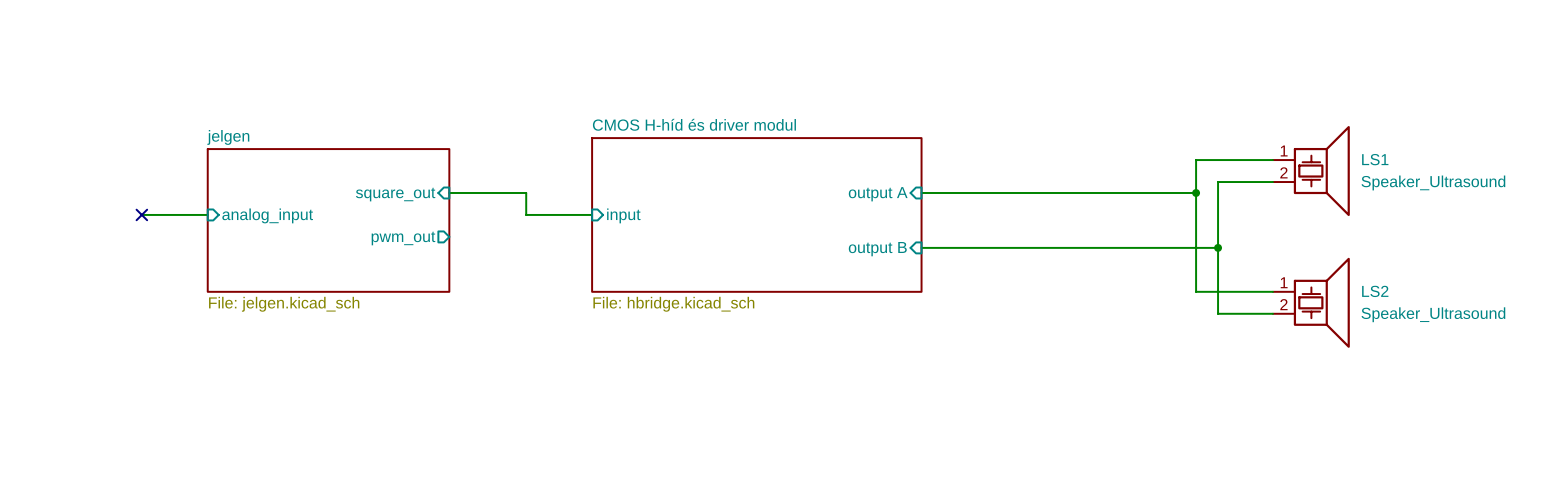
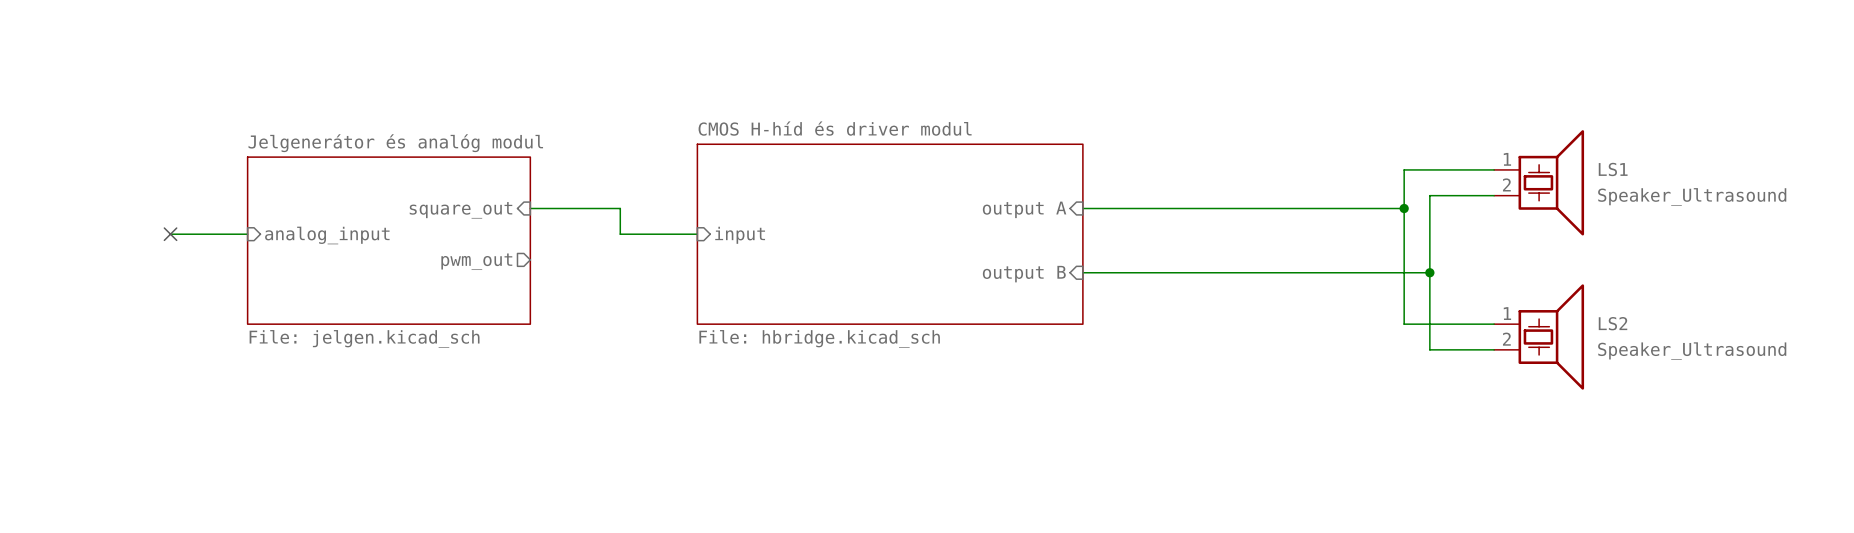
sheet jelgen name: jelgen (228, 137) -> Jelgenerátor és analóg modul (395, 143)

